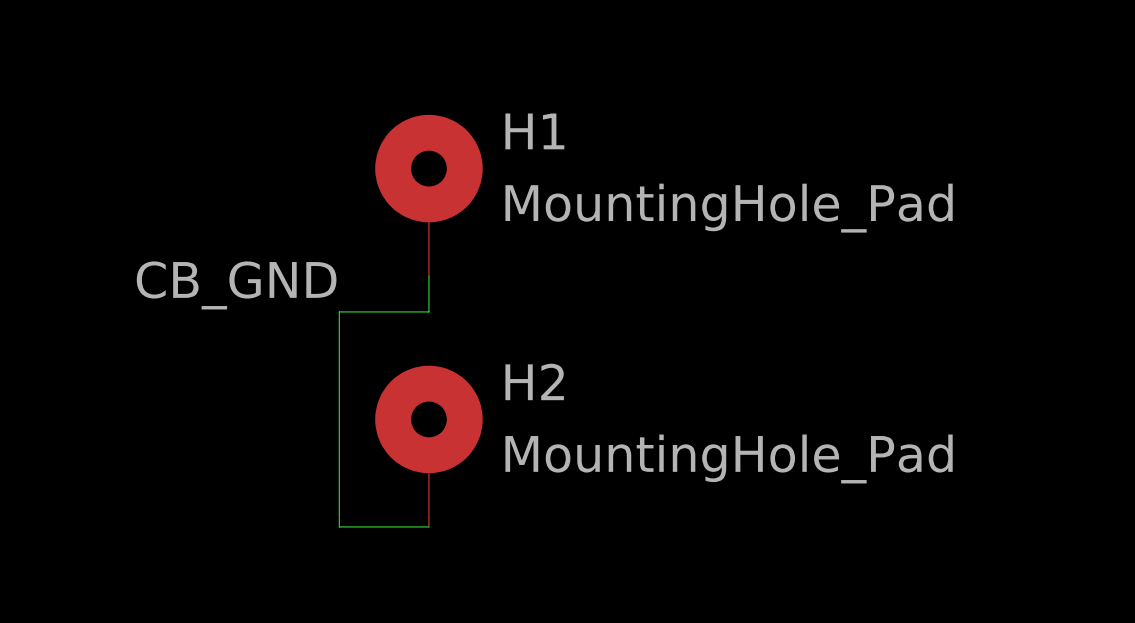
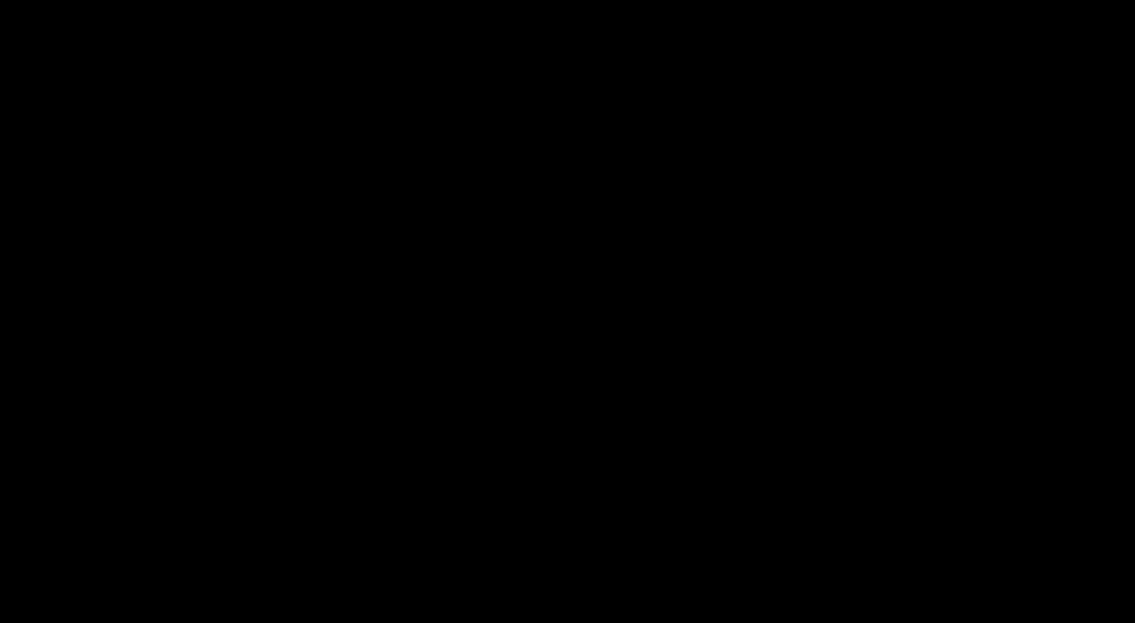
H1: MountingHole_Pad (428, 195) -> none
wire: (428, 276) (428, 311) (339, 311) (339, 526) (428, 526) -> none
label: CB_GND (236, 285) -> none
H2: MountingHole_Pad (428, 446) -> none

